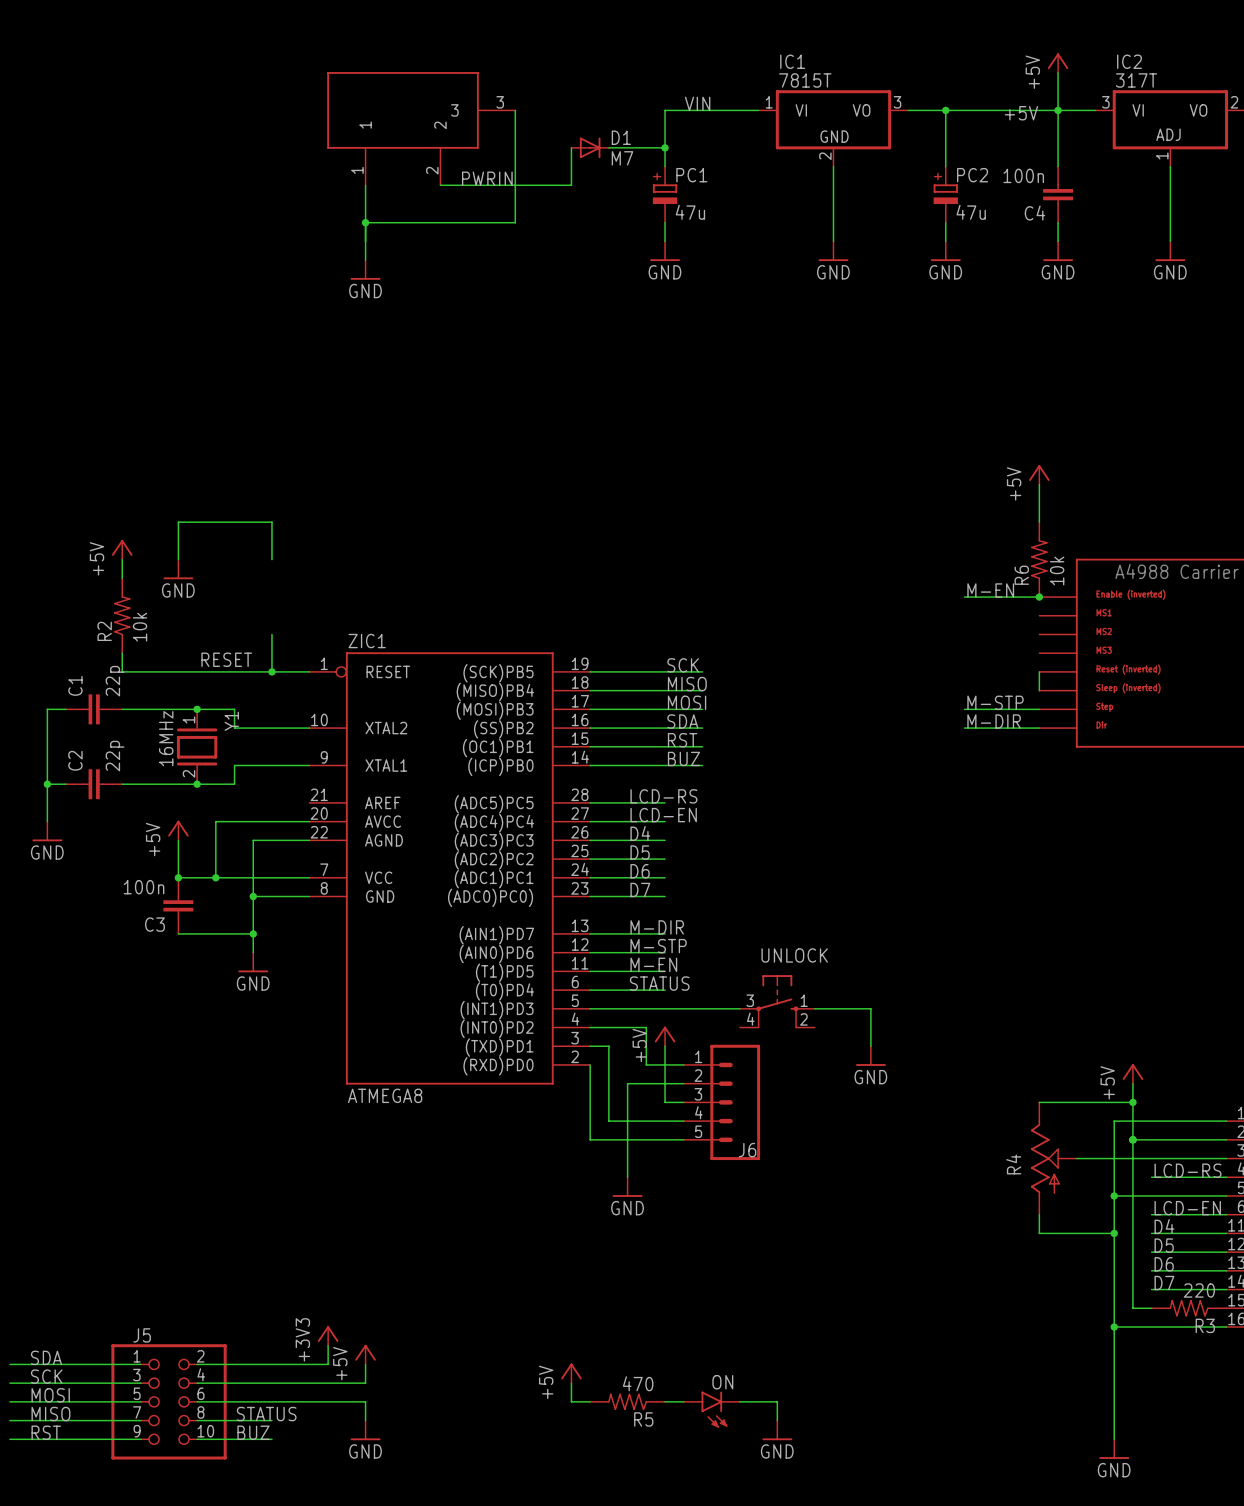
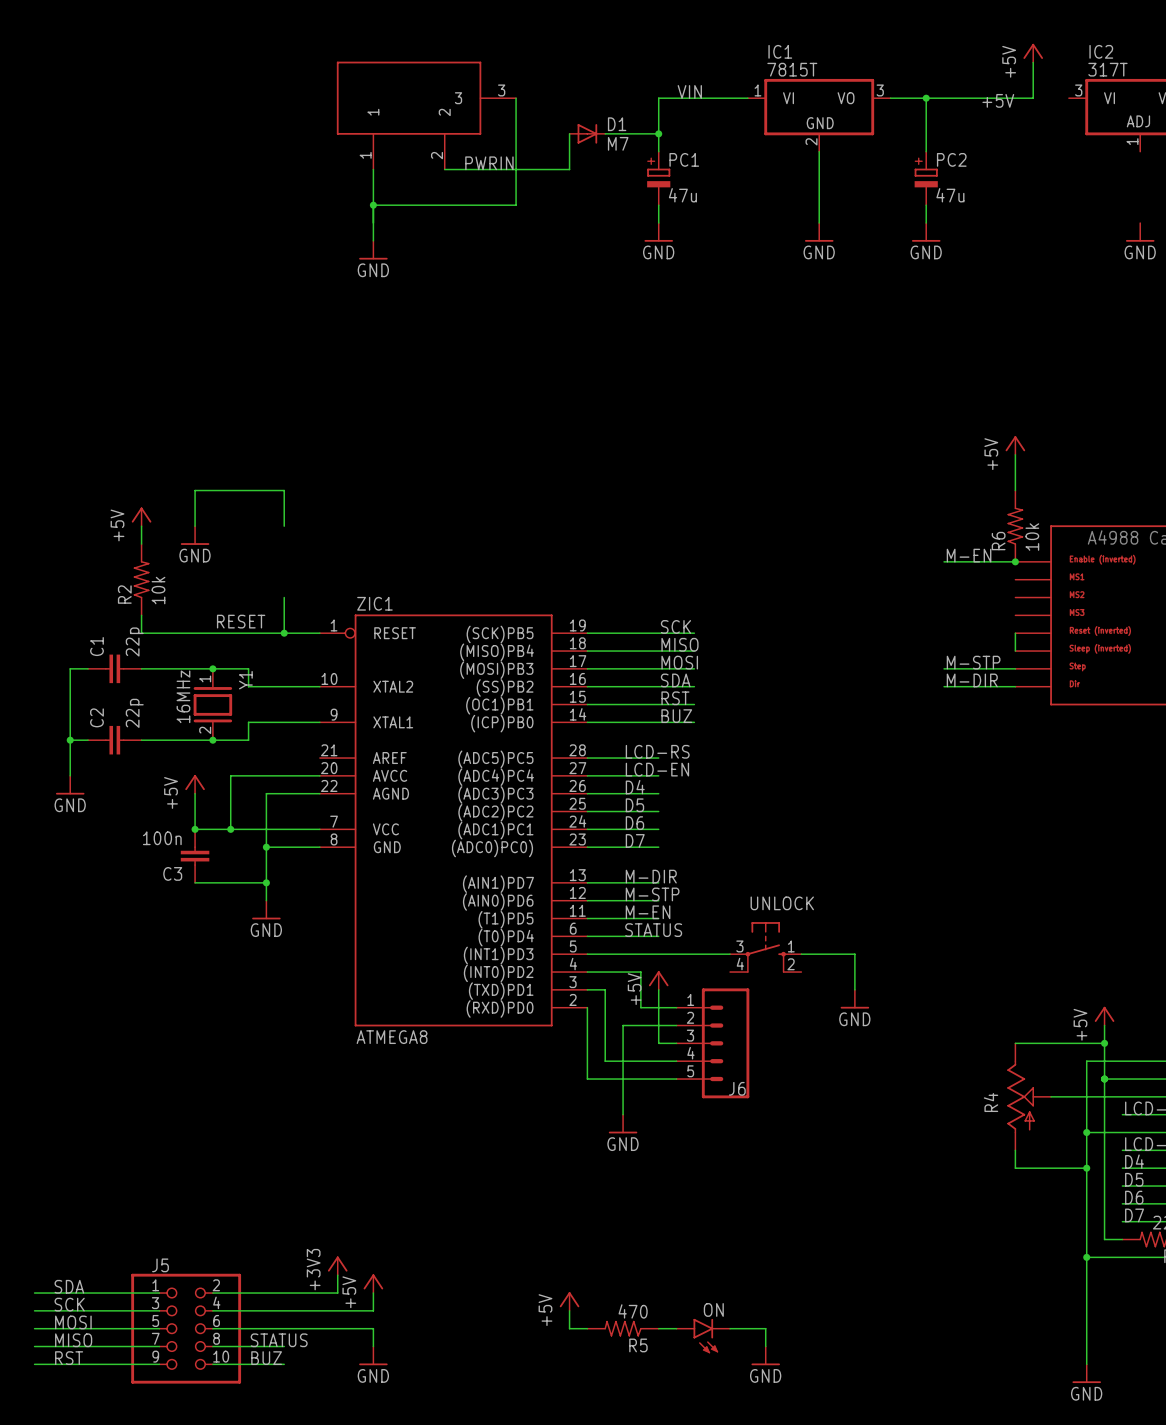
junction: (1058, 110) -> none
wire: (1095, 110) (1058, 110) (1058, 166) -> none
wire: (1170, 166) (1170, 241) -> none
C4: 100n (1058, 194) -> none
wire: (1058, 222) (1058, 241) -> none
power symbol: GND (1058, 251) -> none

